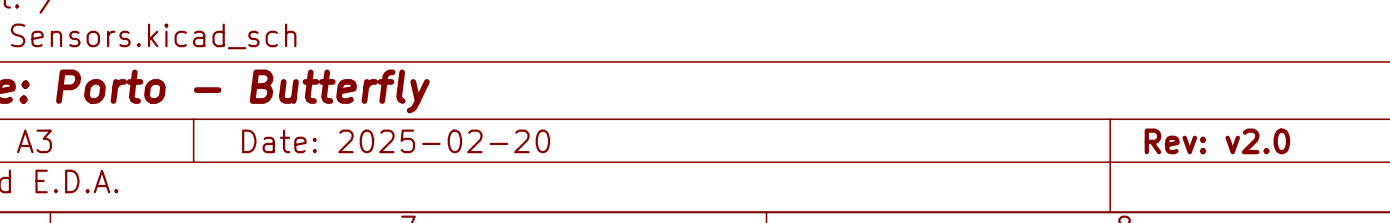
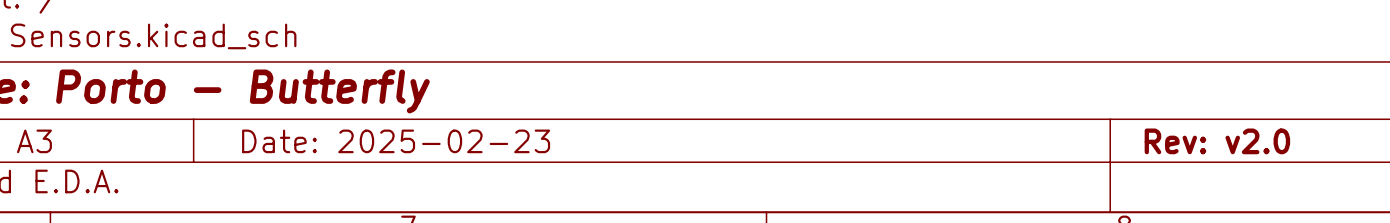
title block: Date: 2025-02-20 (396, 141) -> Date: 2025-02-23 (396, 141)

